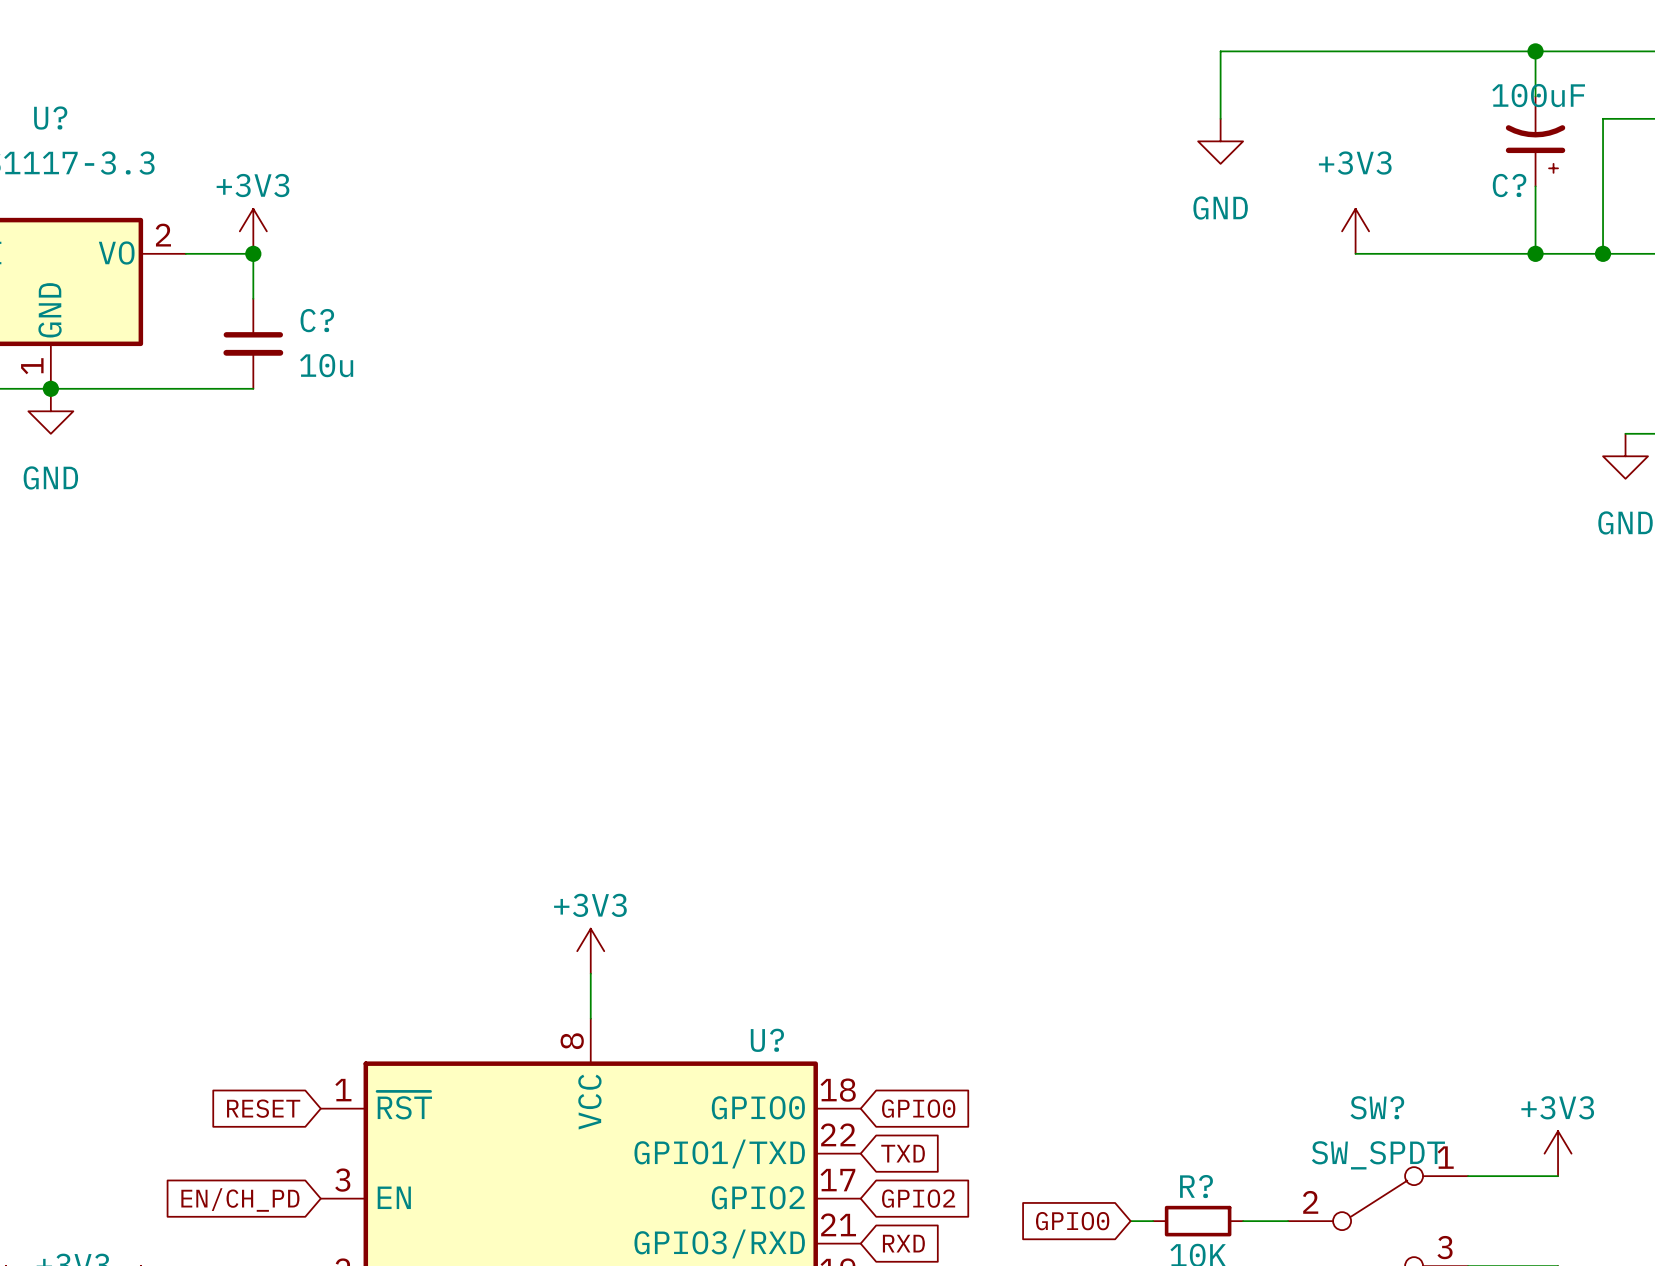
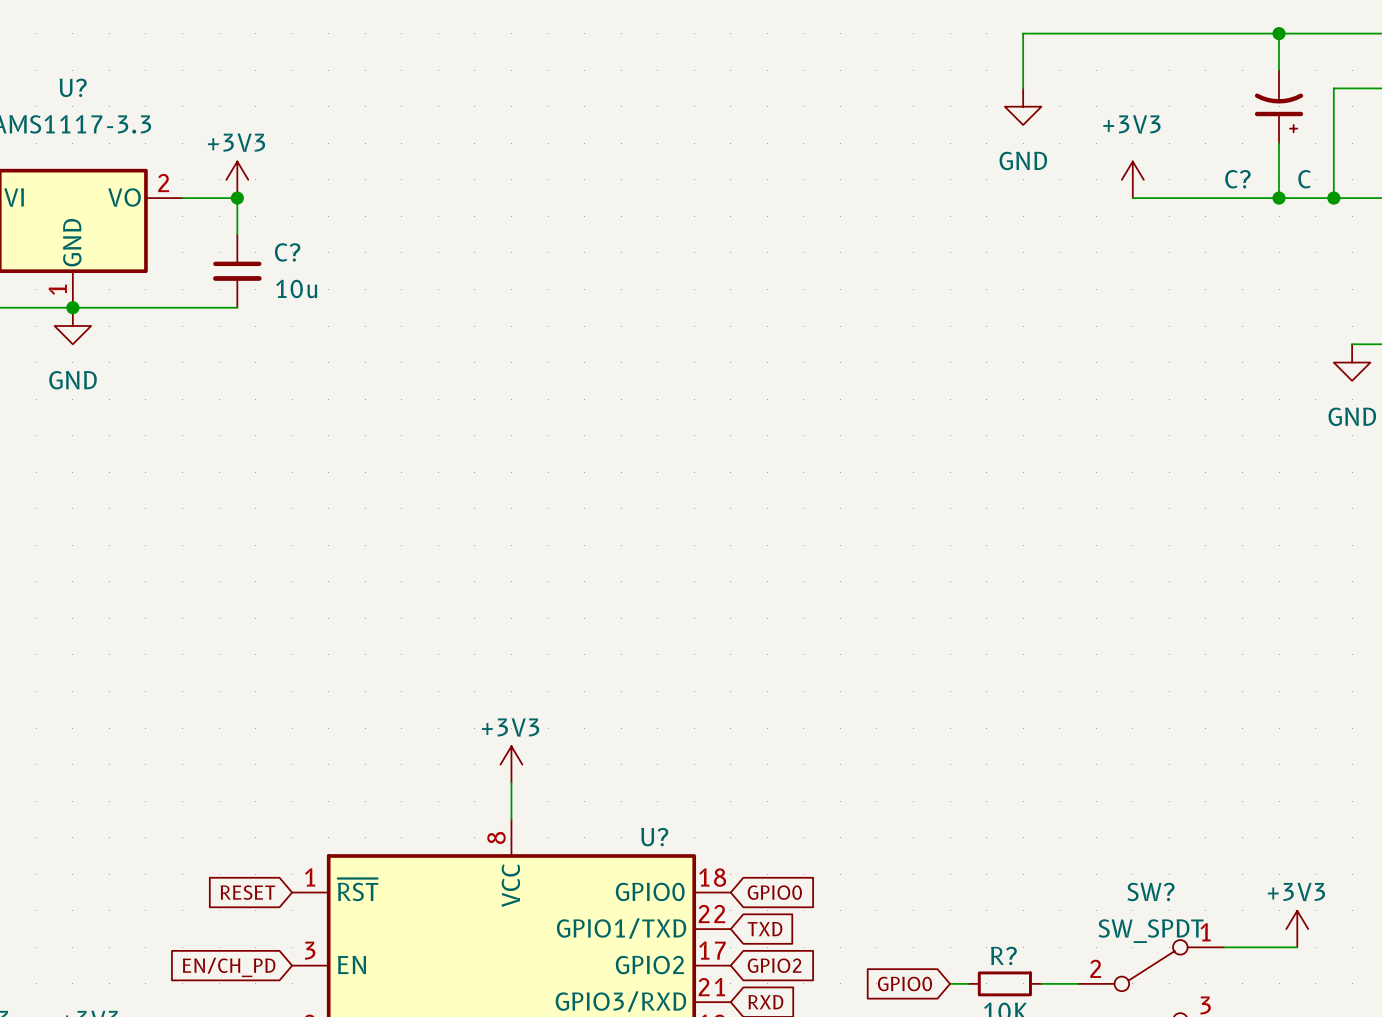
C? value: 100uF (1538, 95) -> C (1304, 179)
C? name position: C? (1509, 185) -> C? (1237, 179)

